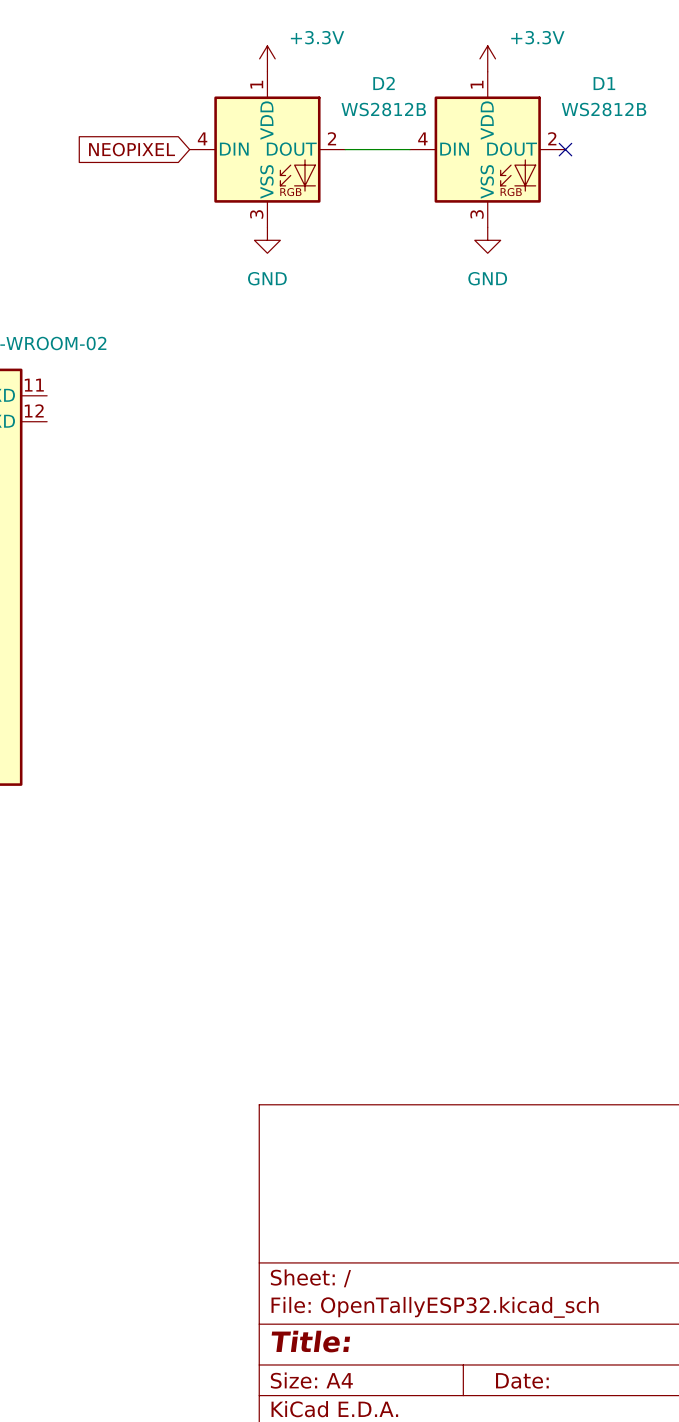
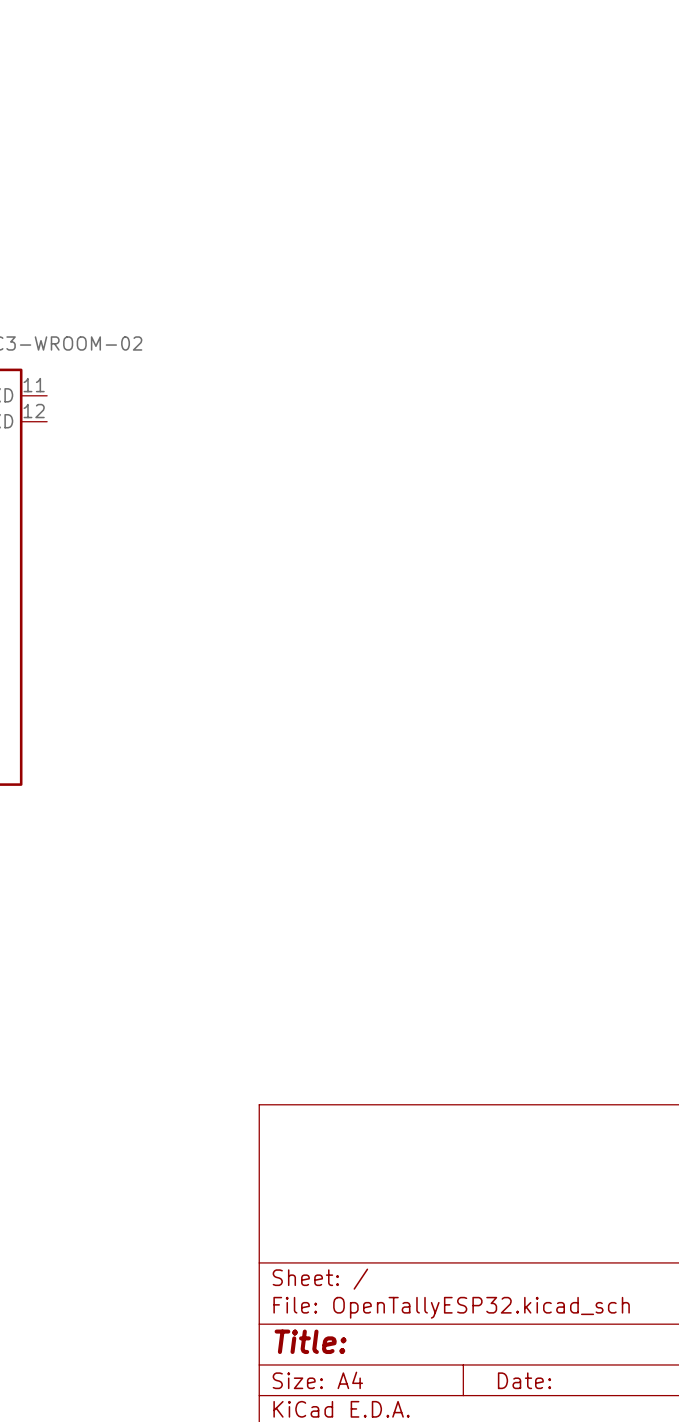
power symbol: +3.3V (267, 58) -> none
power symbol: +3.3V (487, 58) -> none
global label: NEOPIXEL (132, 149) -> none
D2: WS2812B (267, 149) -> none
wire: (345, 149) (409, 149) -> none
D1: WS2812B (487, 149) -> none
no-connect mark: (565, 149) -> none
power symbol: GND (267, 240) -> none
power symbol: GND (487, 240) -> none

